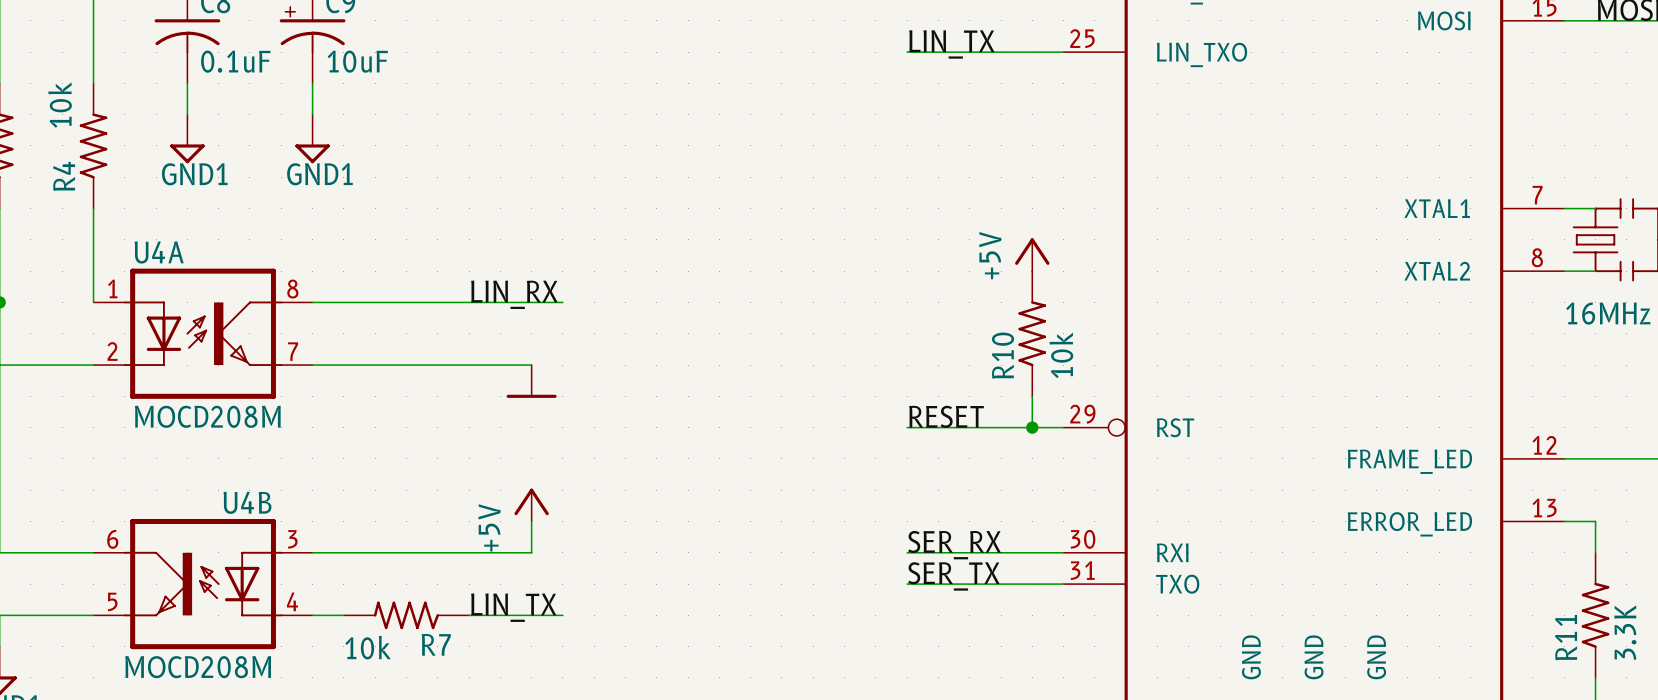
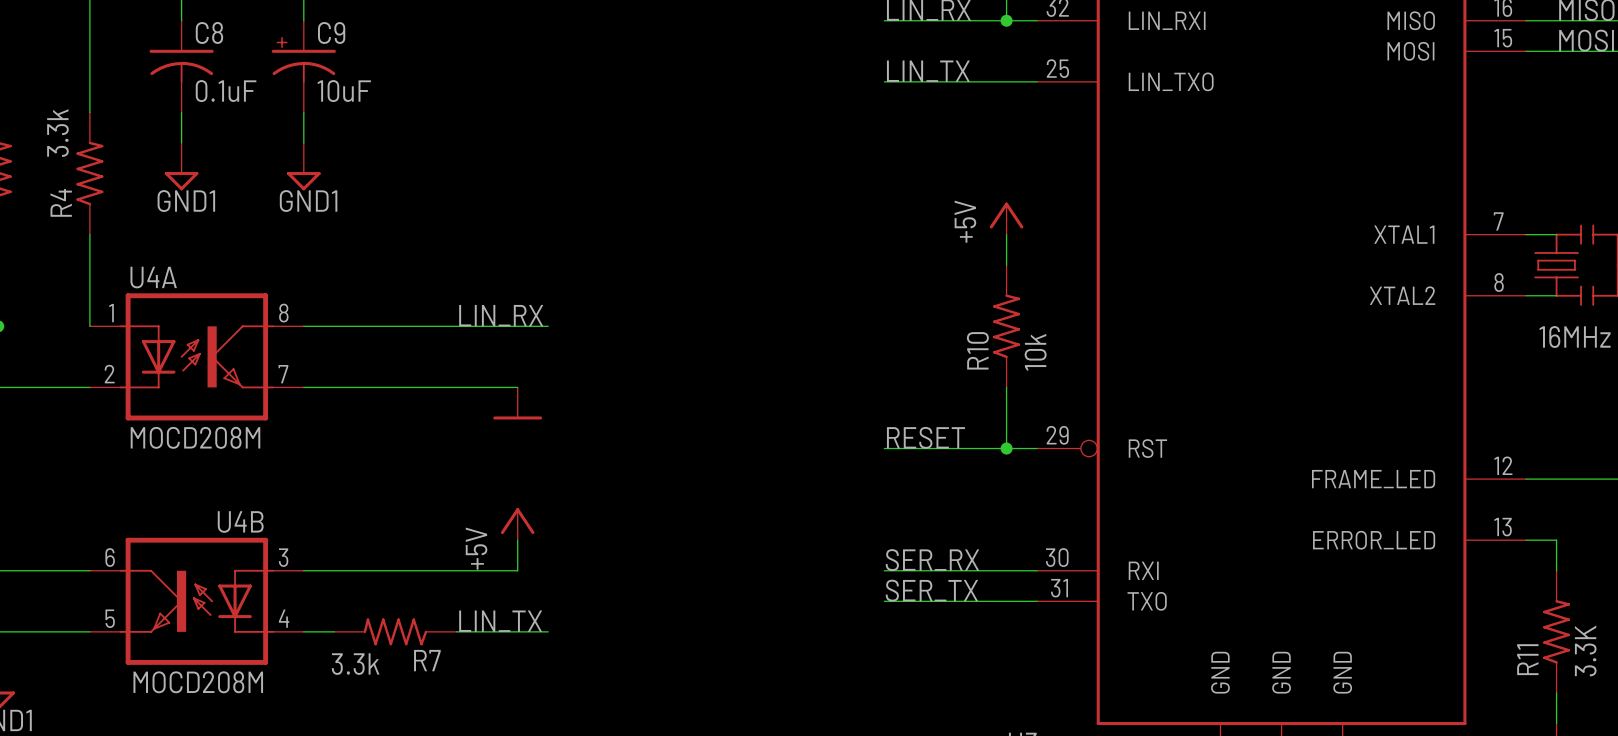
R4 value: 10k (60, 105) -> 3.3k (57, 133)
wire: none -> (1006, 234) (1006, 265)
power symbol position: +5V (1032, 254) -> +5V (1006, 218)
R10 position: (1032, 333) -> (1006, 326)
R7 value: 10k (368, 647) -> 3.3k (355, 664)

